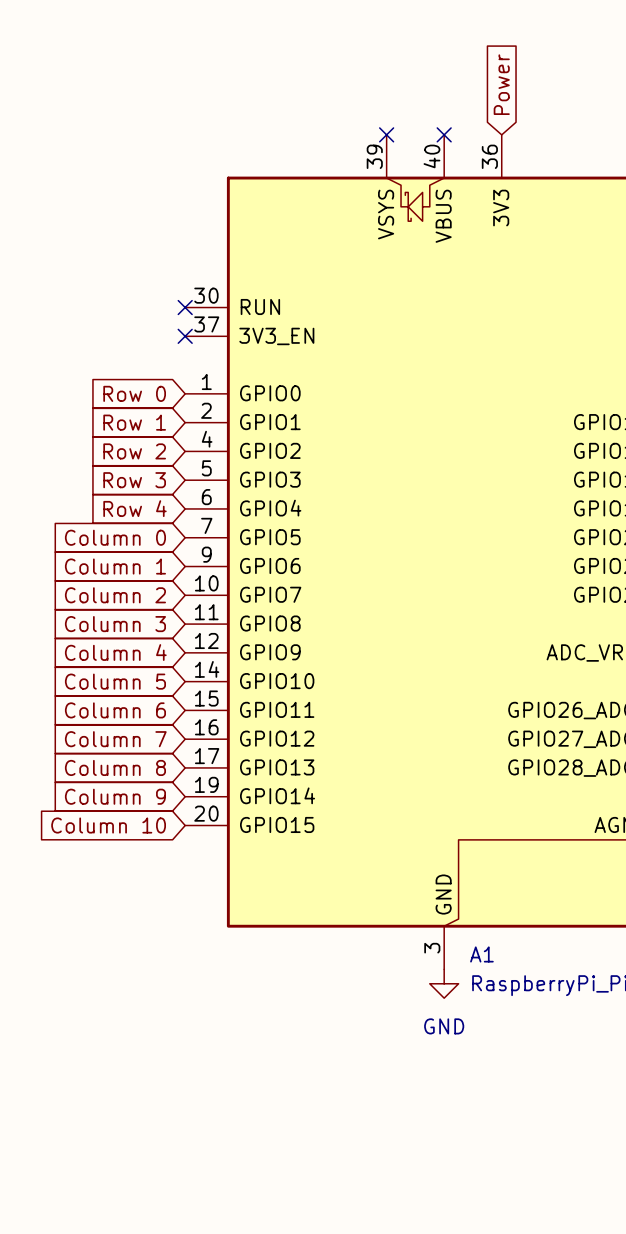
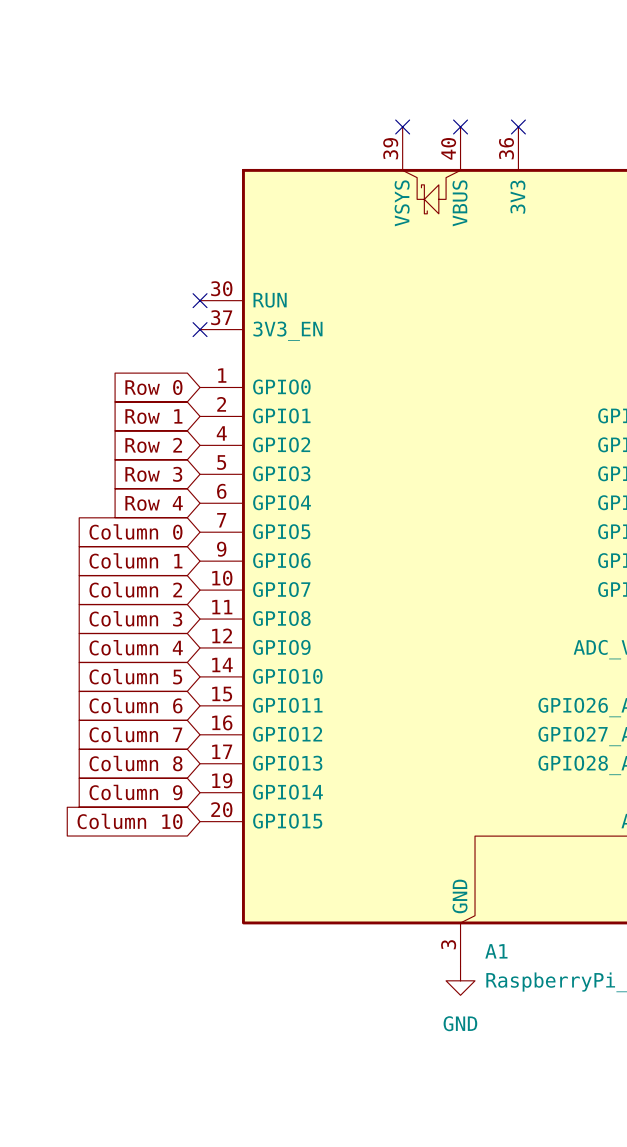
global label: Power (501, 84) -> none
no-connect mark: none -> (518, 126)

